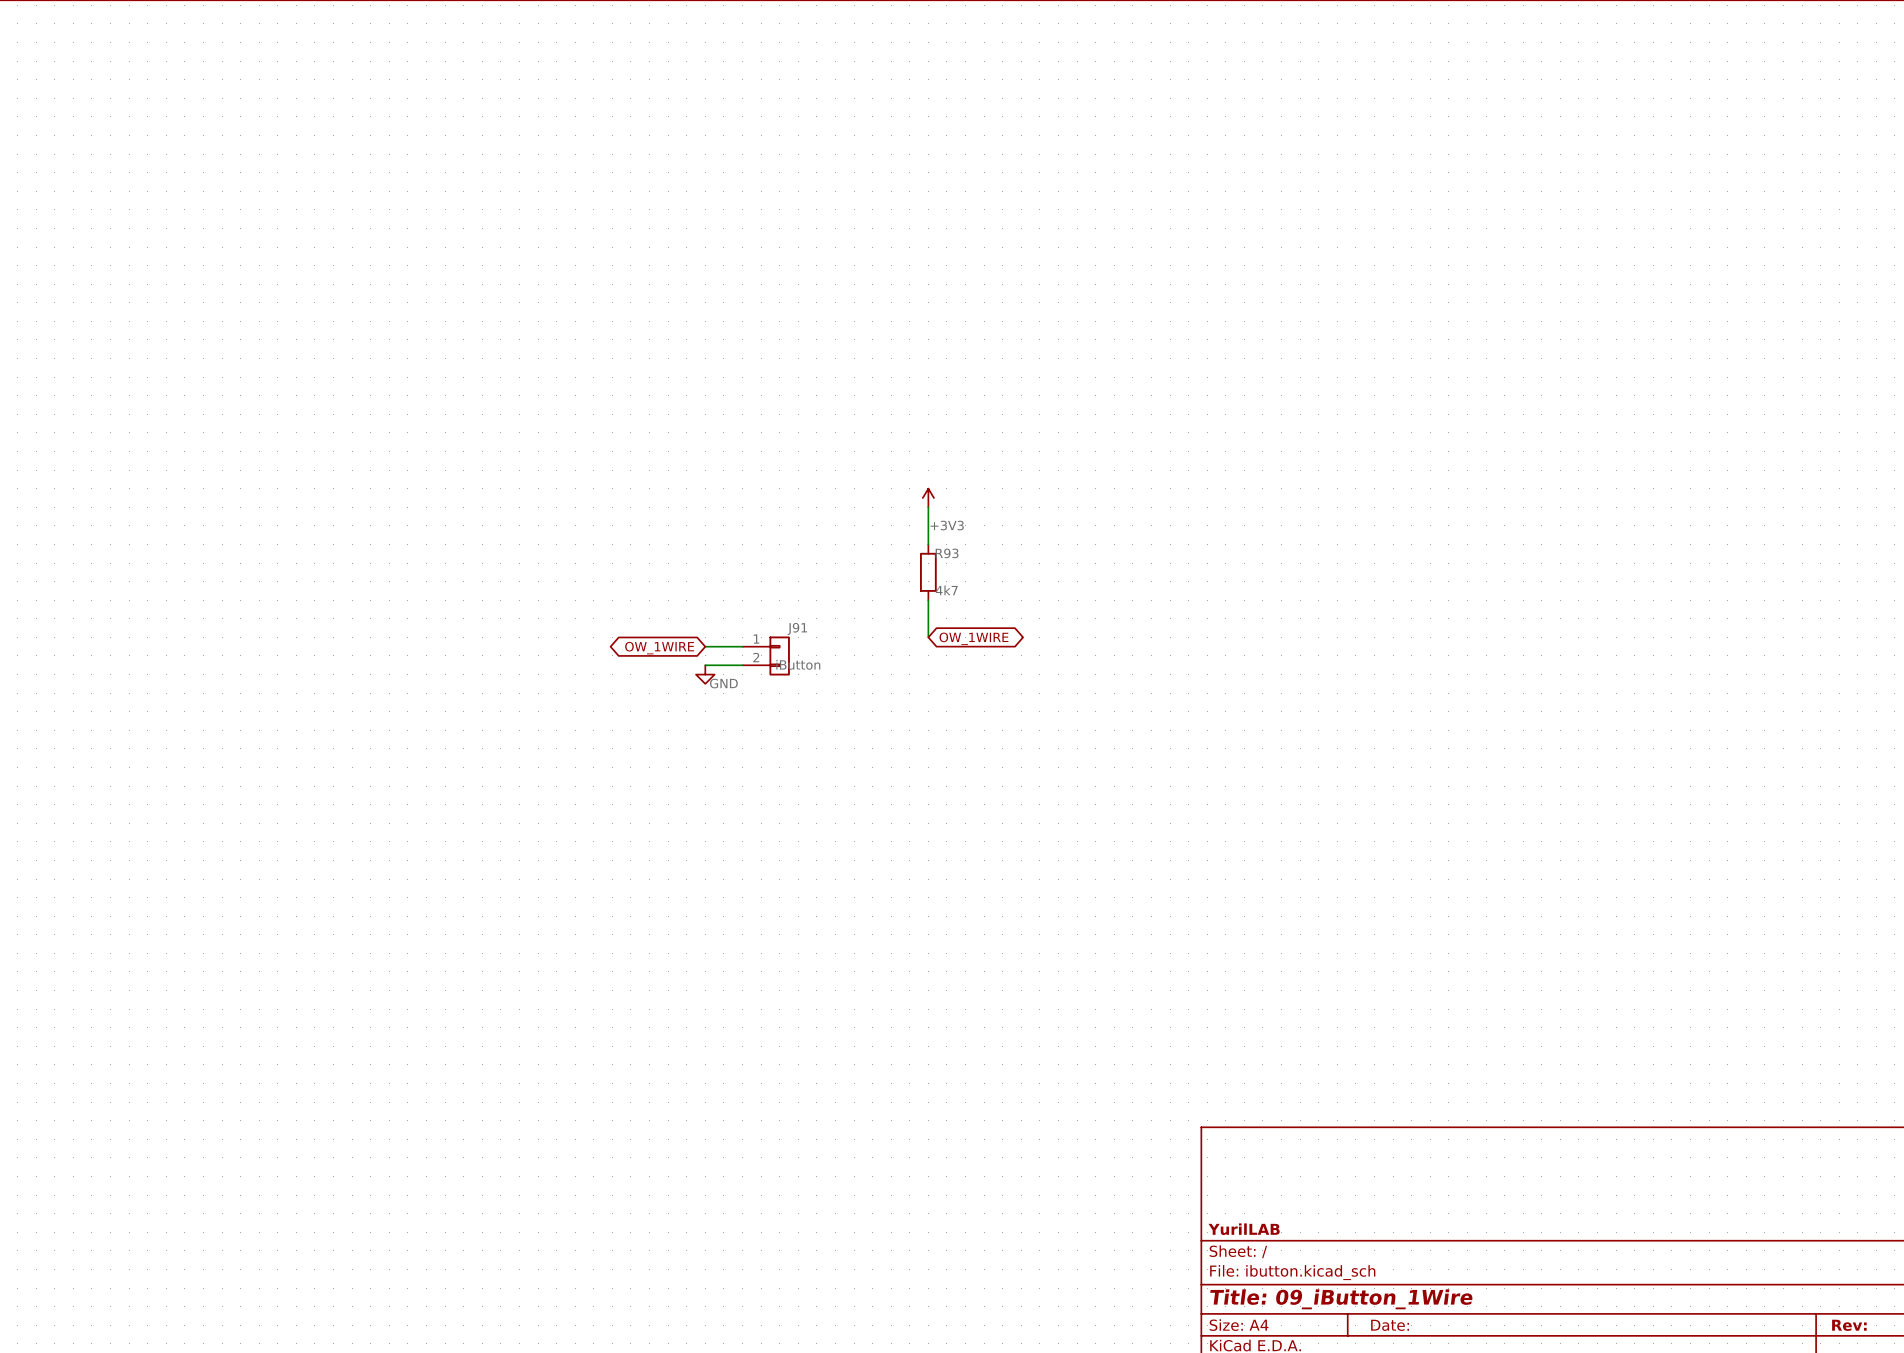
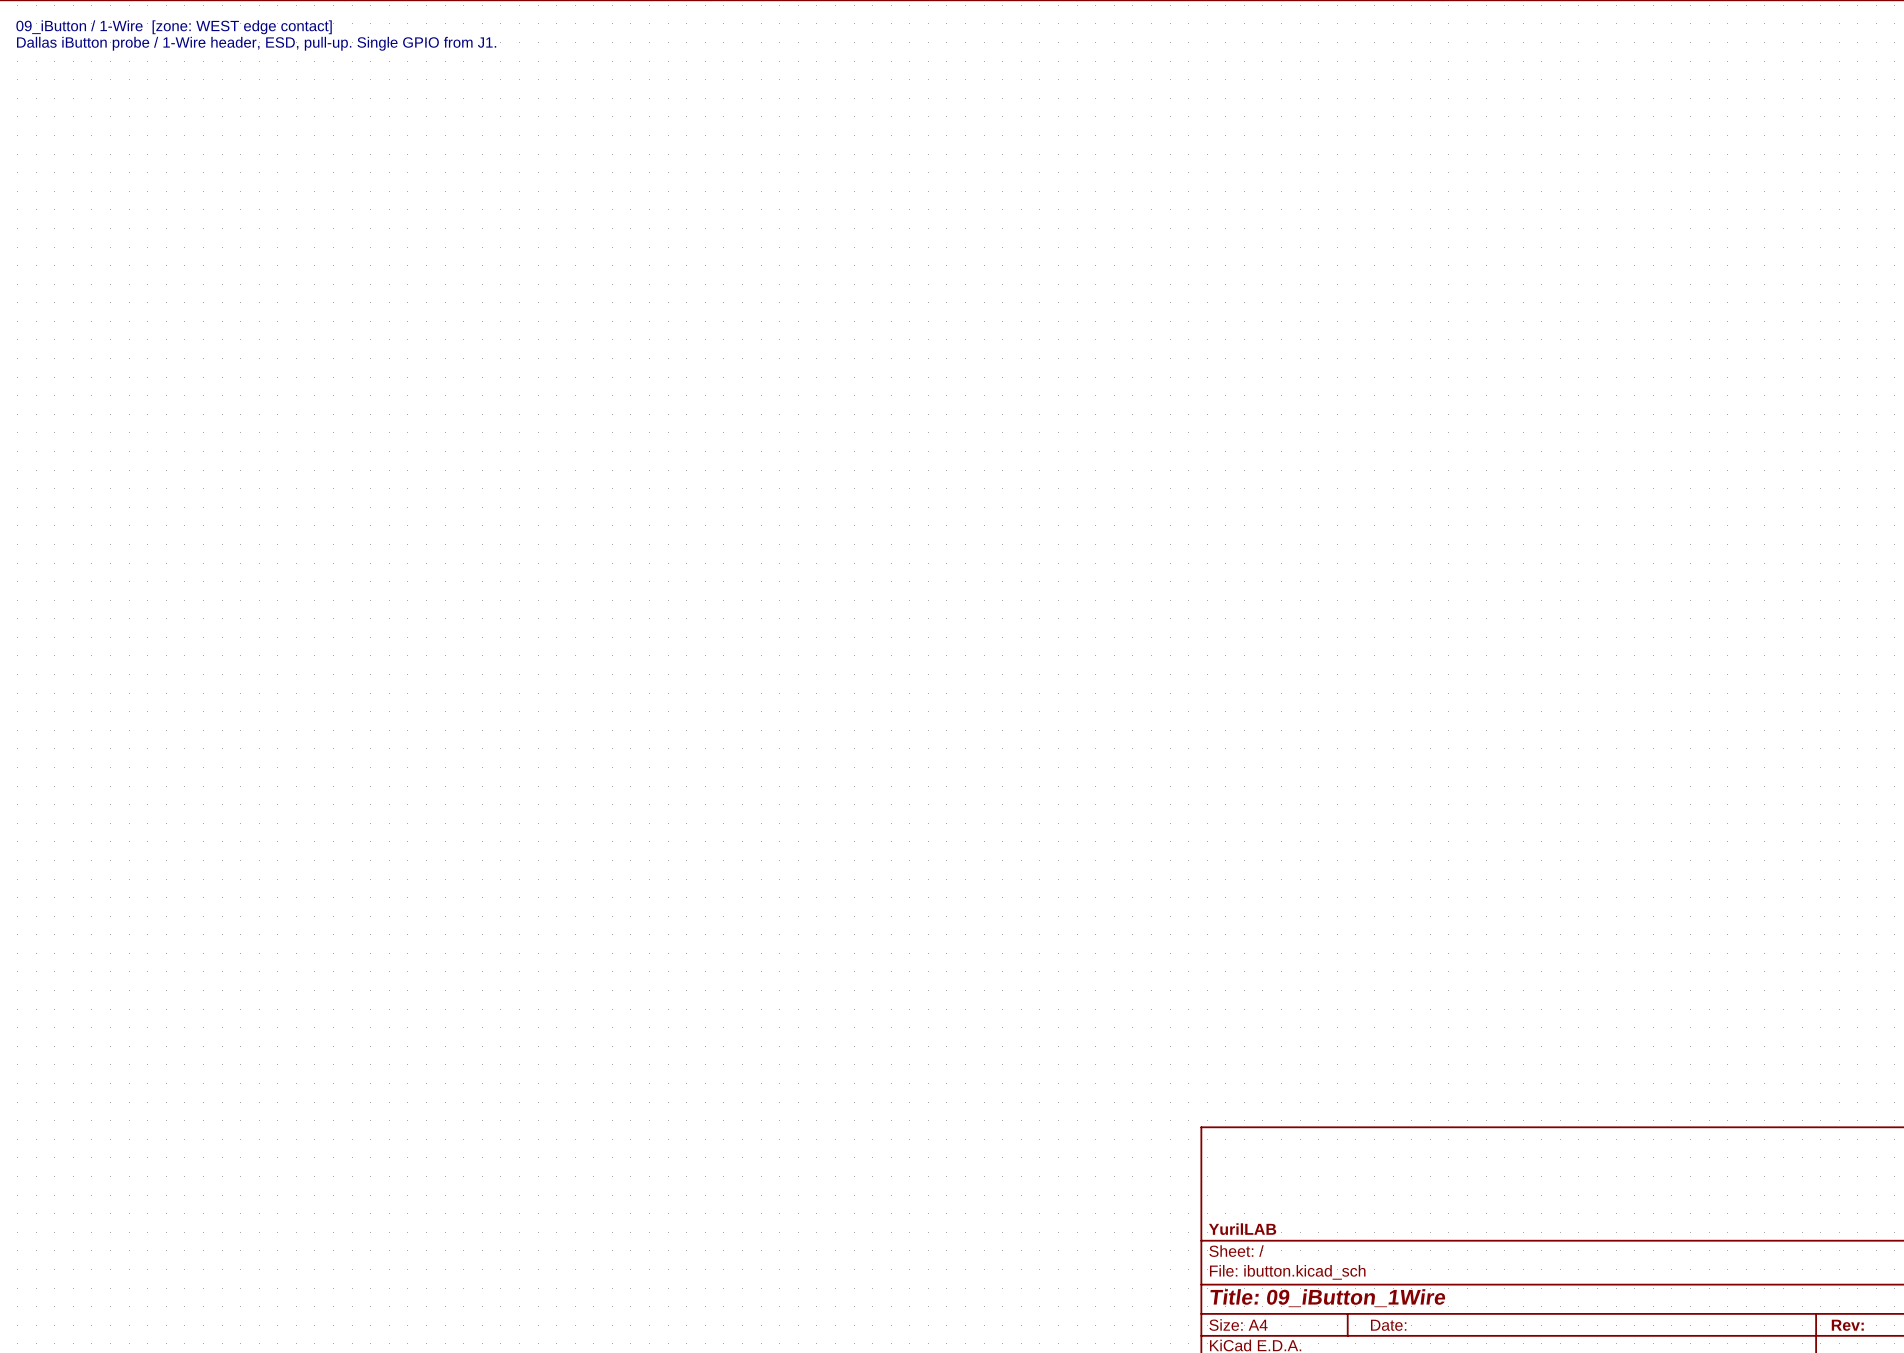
text: none -> 09_iButton / 1-Wire [zone: WEST edge contact] (174, 27)
text: none -> Dallas iButton probe / 1-Wire header, ESD, pull-up. Single GPIO from J1. (256, 43)
power symbol: +3V3 (928, 497) -> none
wire: (928, 507) (928, 544) -> none
R93: 4k7 (928, 572) -> none
wire: (928, 600) (928, 637) -> none
global label: OW_1WIRE (973, 638) -> none
wire: (705, 646) (742, 646) -> none
global label: OW_1WIRE (659, 648) -> none
J91: iButton (766, 655) -> none
wire: (705, 665) (742, 665) -> none
power symbol: GND (705, 674) -> none

